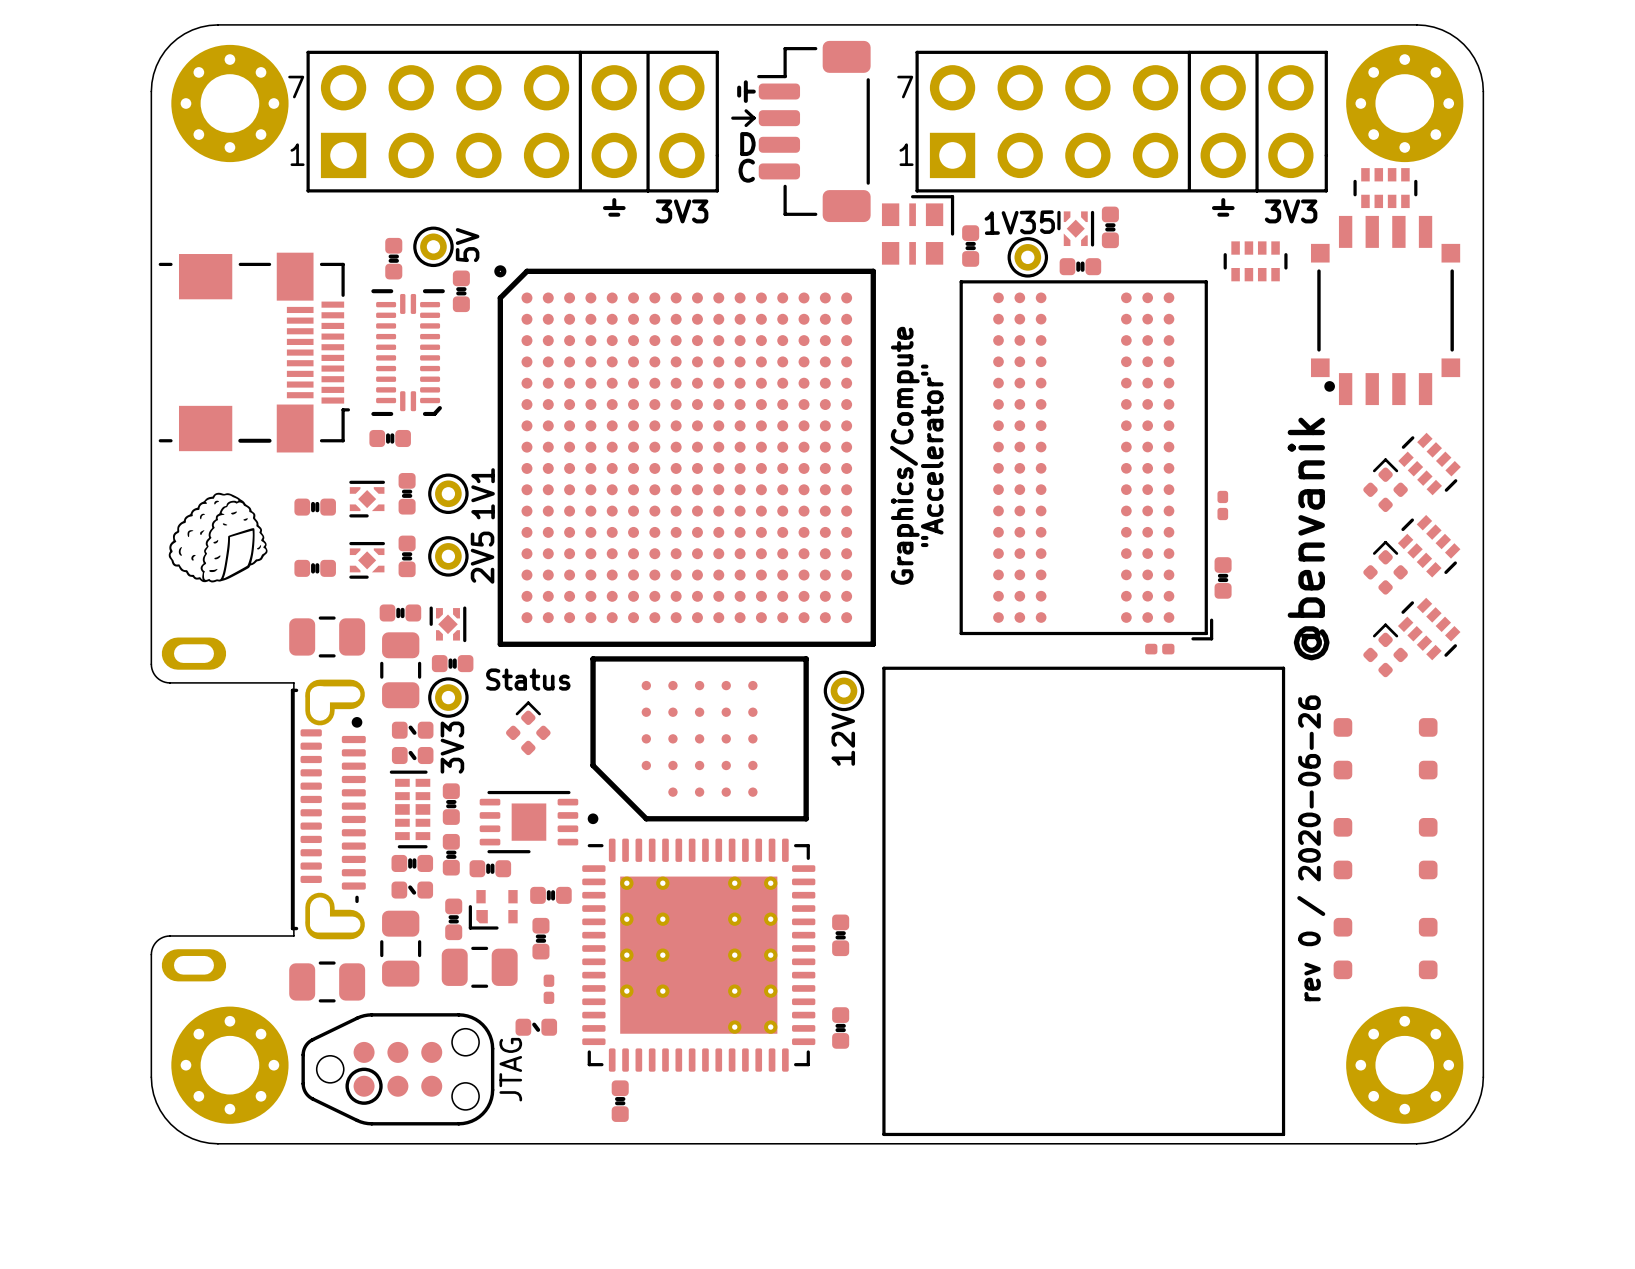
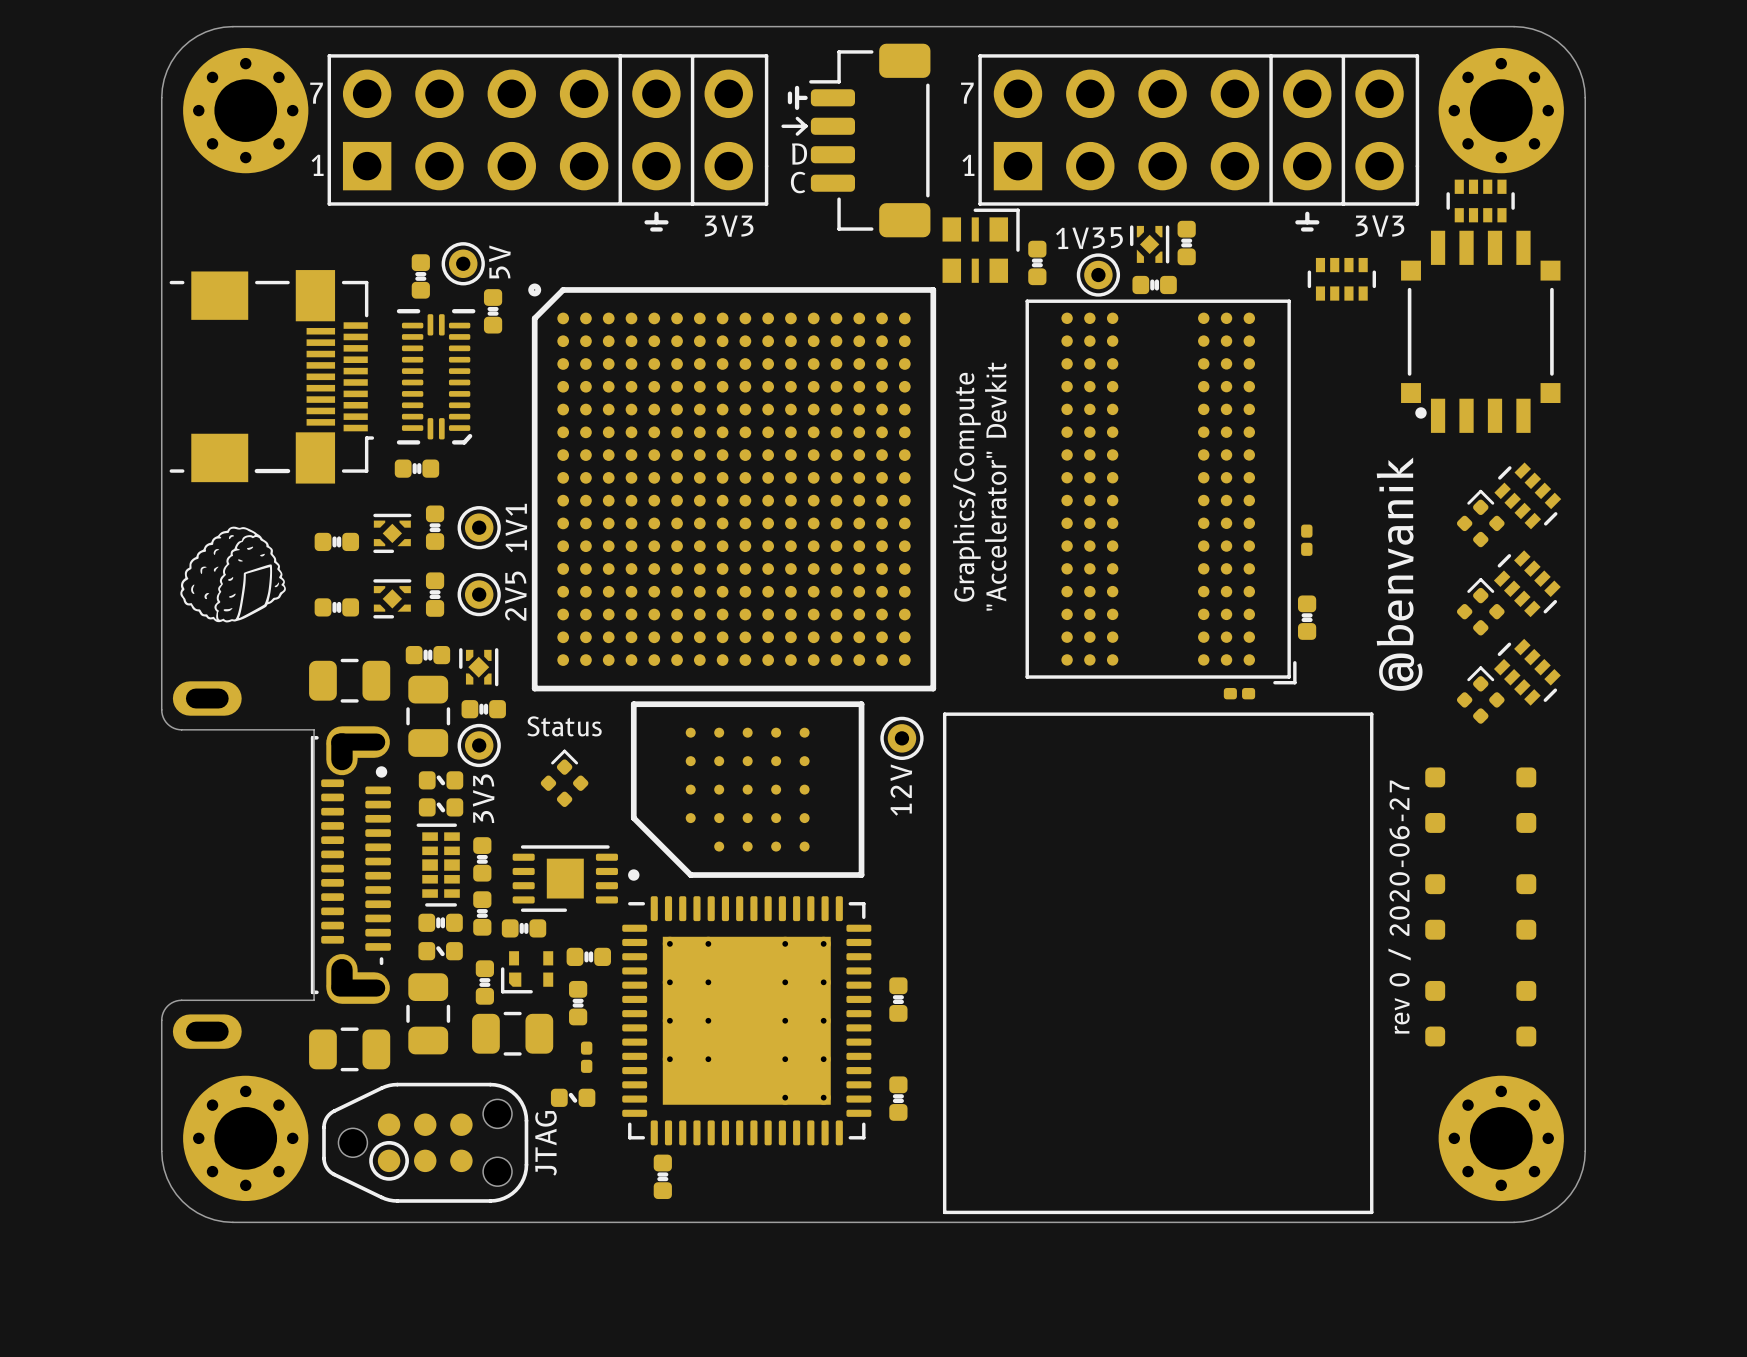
text: "Accelerator" (932, 455) -> "Accelerator" Devkit (995, 486)
text: rev 0 / 2020-06-26 (1311, 848) -> rev 0 / 2020-06-27 (1399, 907)

